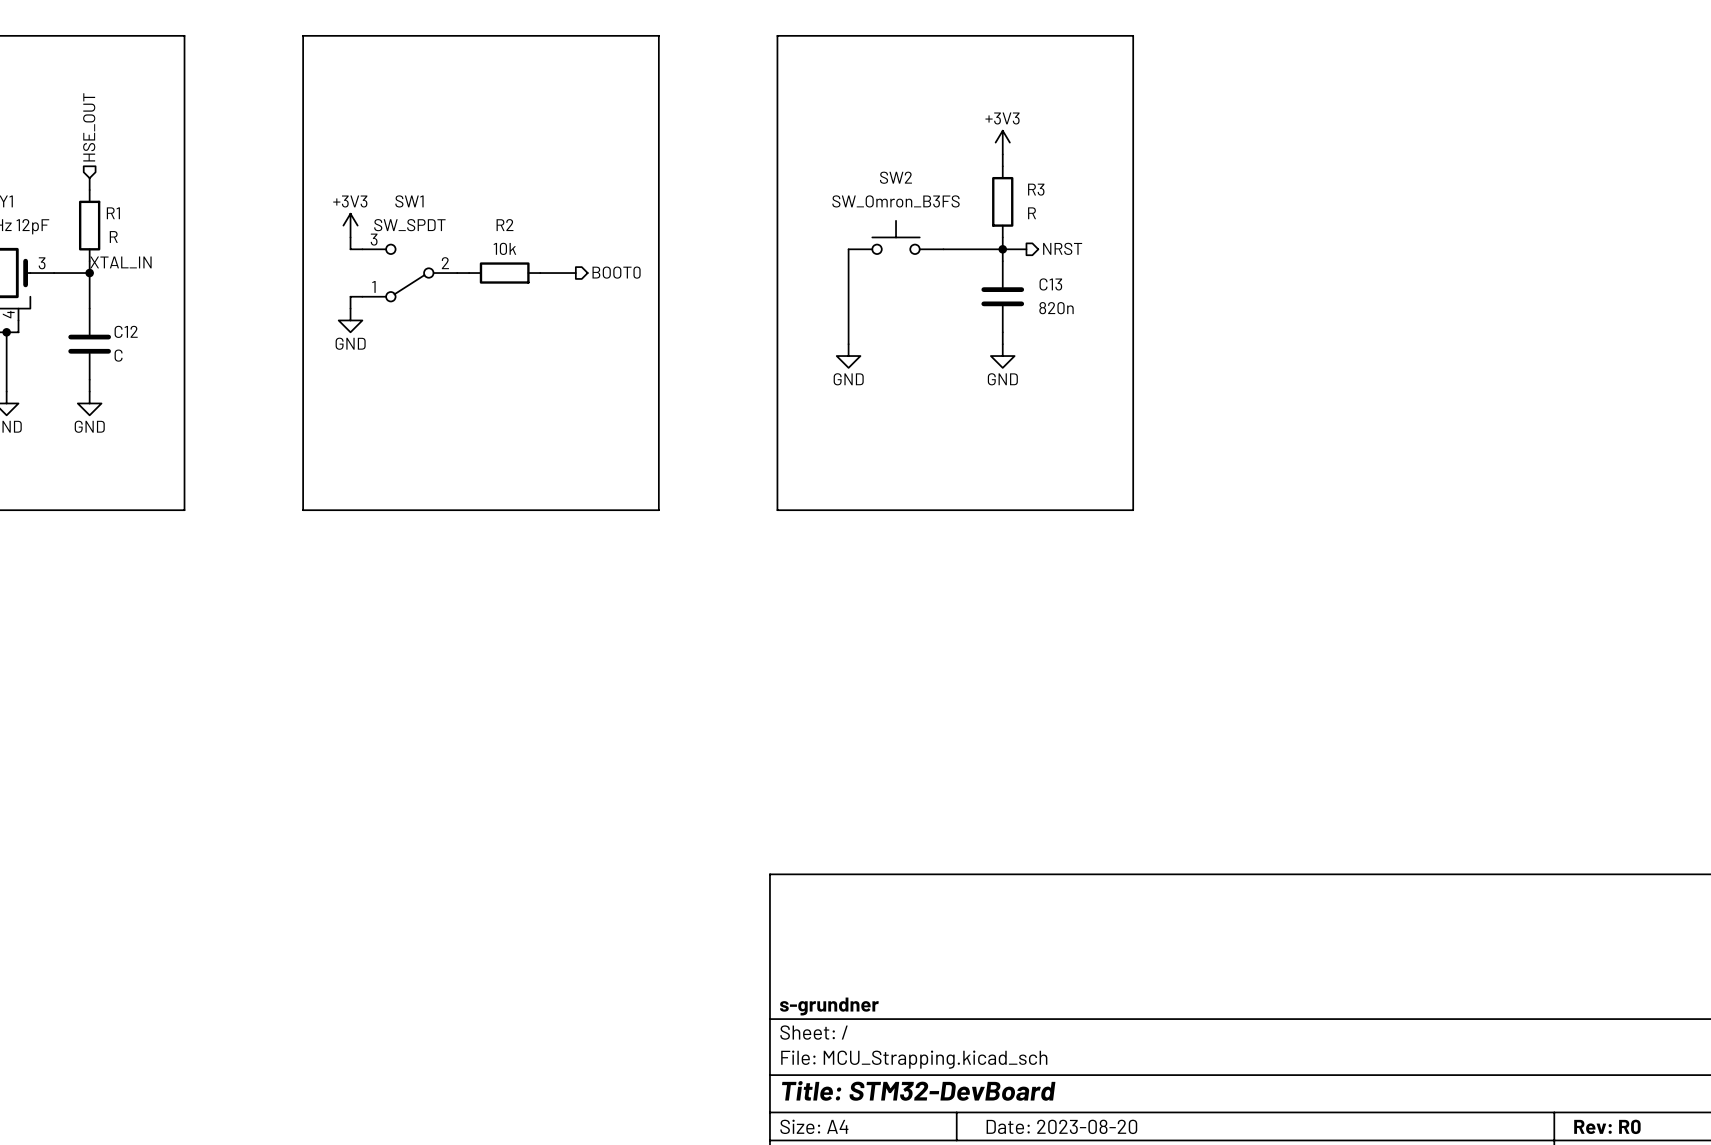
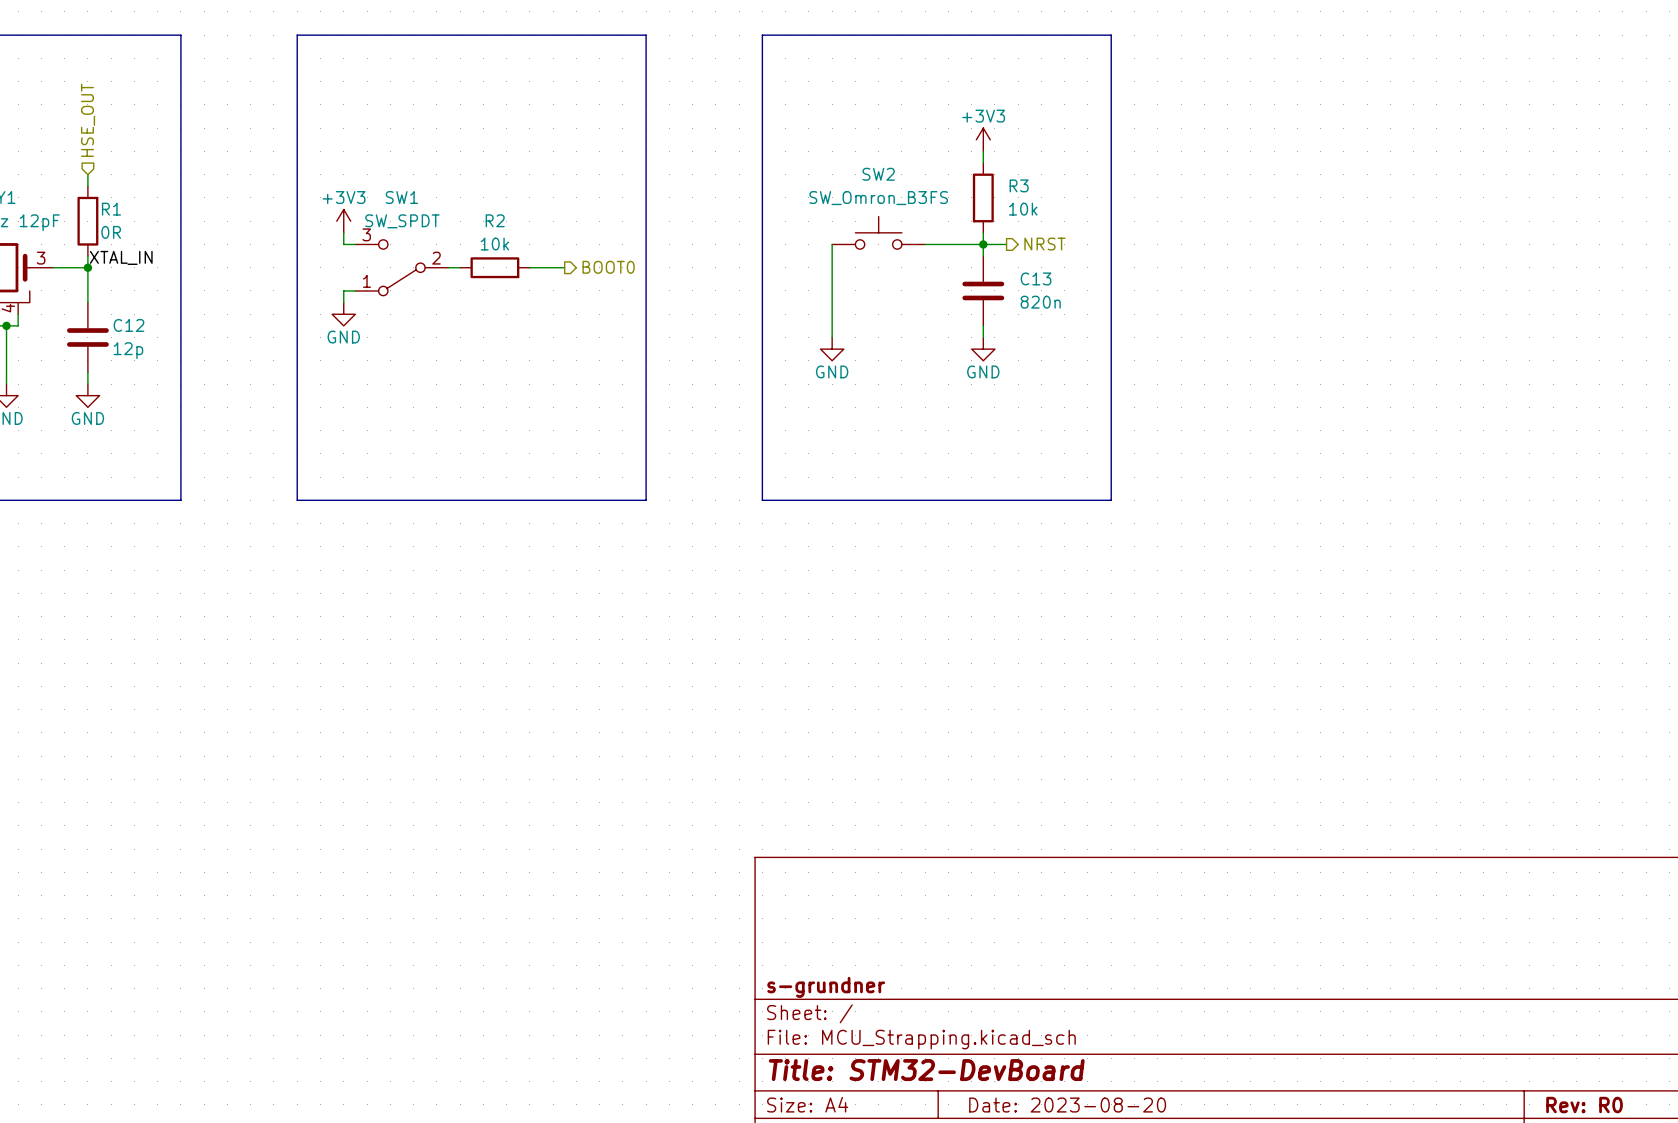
R3 value: R (1032, 213) -> 10k (1023, 209)
R1 value: R (113, 237) -> 0R (111, 232)
C12 value: C (118, 355) -> 12p (128, 350)

